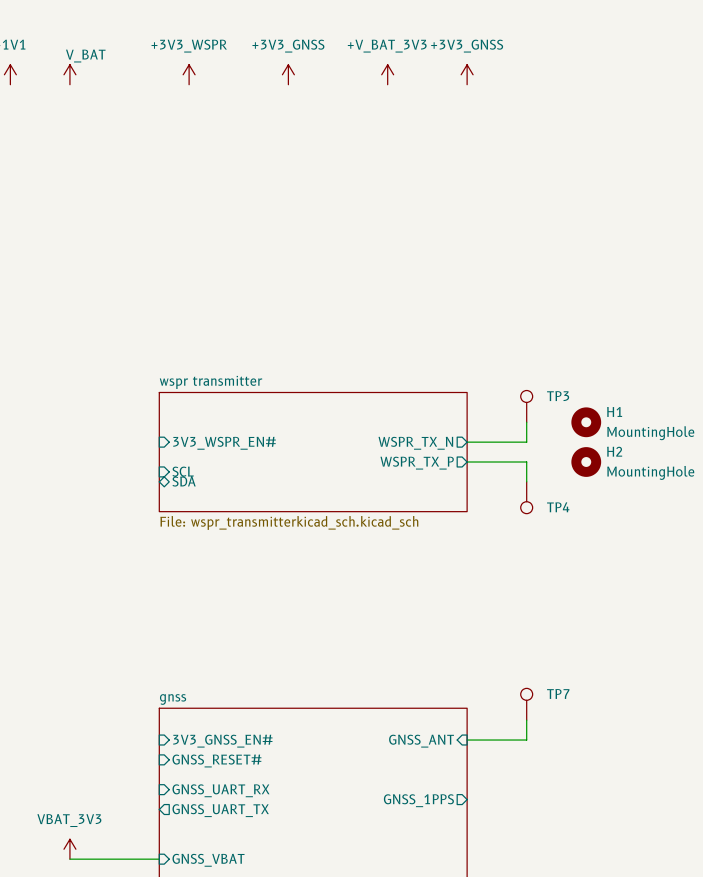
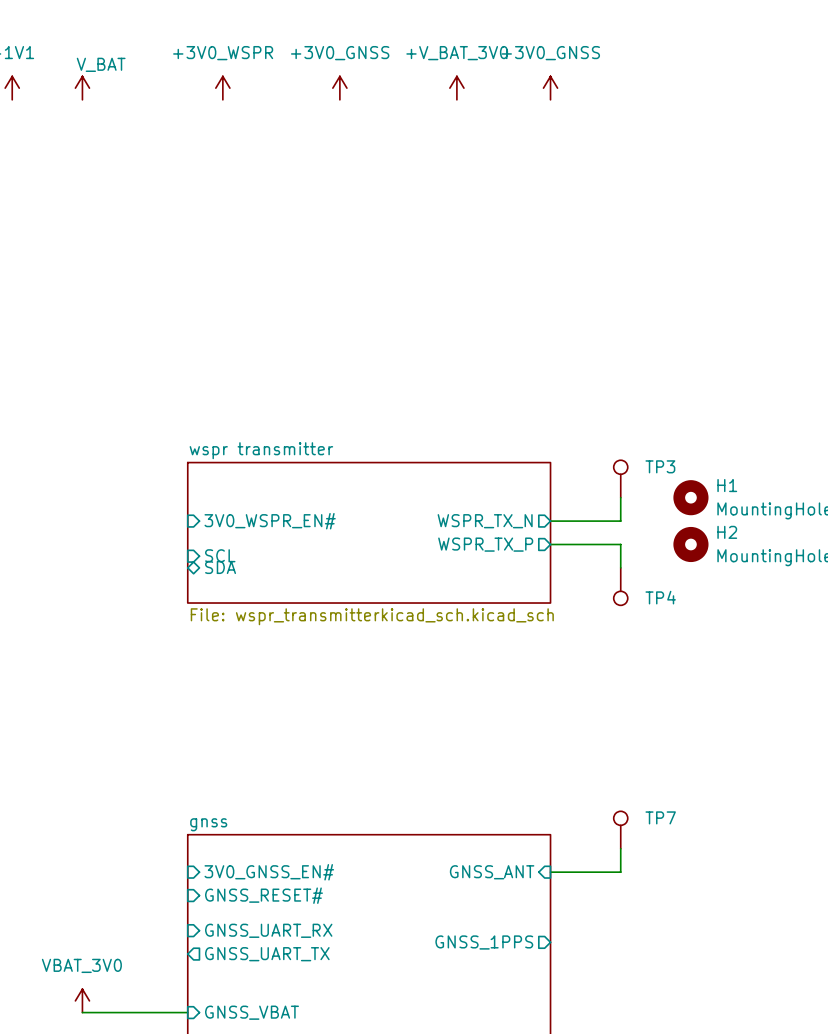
power symbol: +3V3_WSPR (189, 74) -> +3V0_WSPR (222, 88)
power symbol: +3V3_GNSS (288, 74) -> +3V0_GNSS (339, 88)
power symbol: +V_BAT_3V3 (387, 74) -> +V_BAT_3V0 (456, 88)
power symbol: +3V3_GNSS (467, 74) -> +3V0_GNSS (550, 88)
sheet pin: 3V3_WSPR_EN# (224, 443) -> 3V0_WSPR_EN# (270, 521)
sheet pin: 3V3_GNSS_EN# (222, 741) -> 3V0_GNSS_EN# (269, 872)
power symbol: VBAT_3V3 (69, 849) -> VBAT_3V0 (82, 1000)

